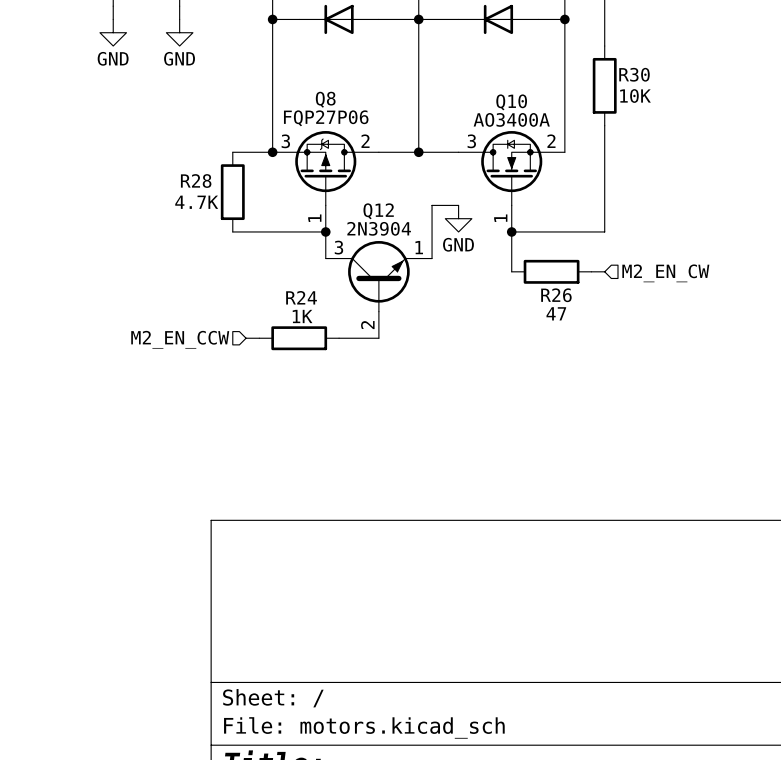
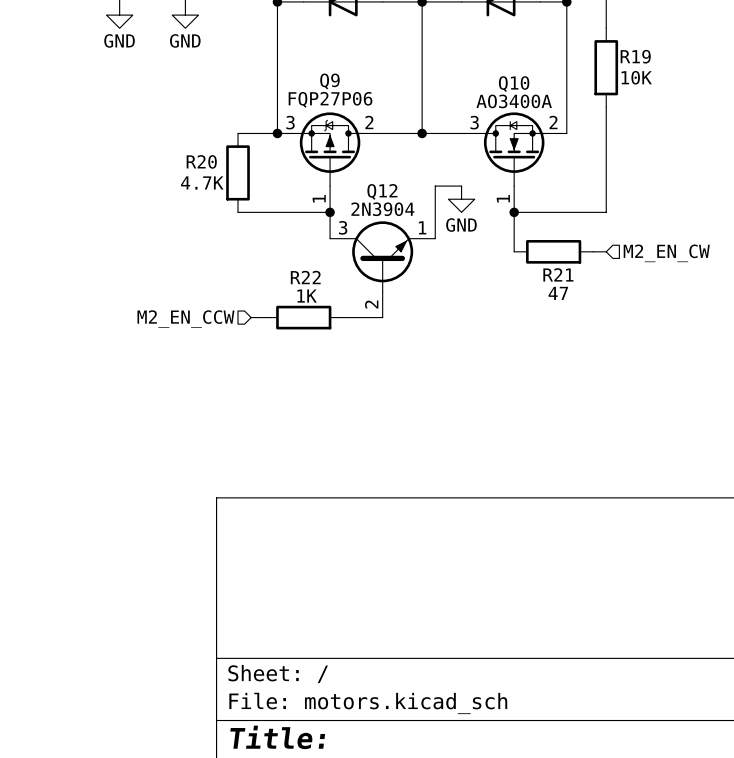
R30 name: R30 (634, 74) -> R19 (635, 56)
Q8 name: Q8 (325, 99) -> Q9 (329, 81)
R28 name: R28 (196, 181) -> R20 (201, 161)
R26 name: R26 (556, 295) -> R21 (558, 274)
R24 name: R24 (301, 297) -> R22 (305, 277)

